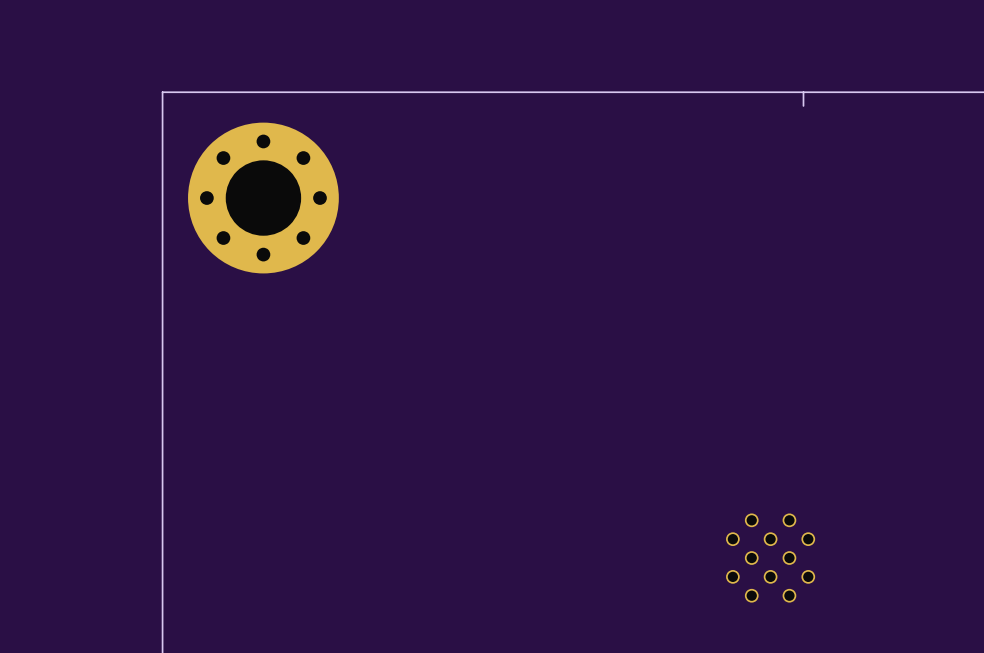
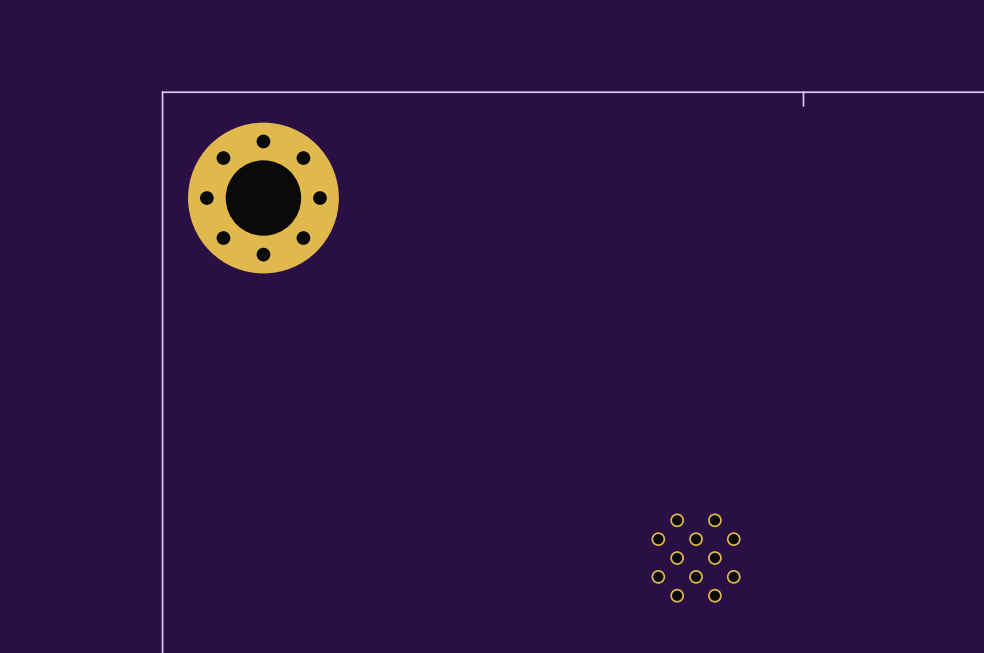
part position: (770, 558) -> (696, 558)

